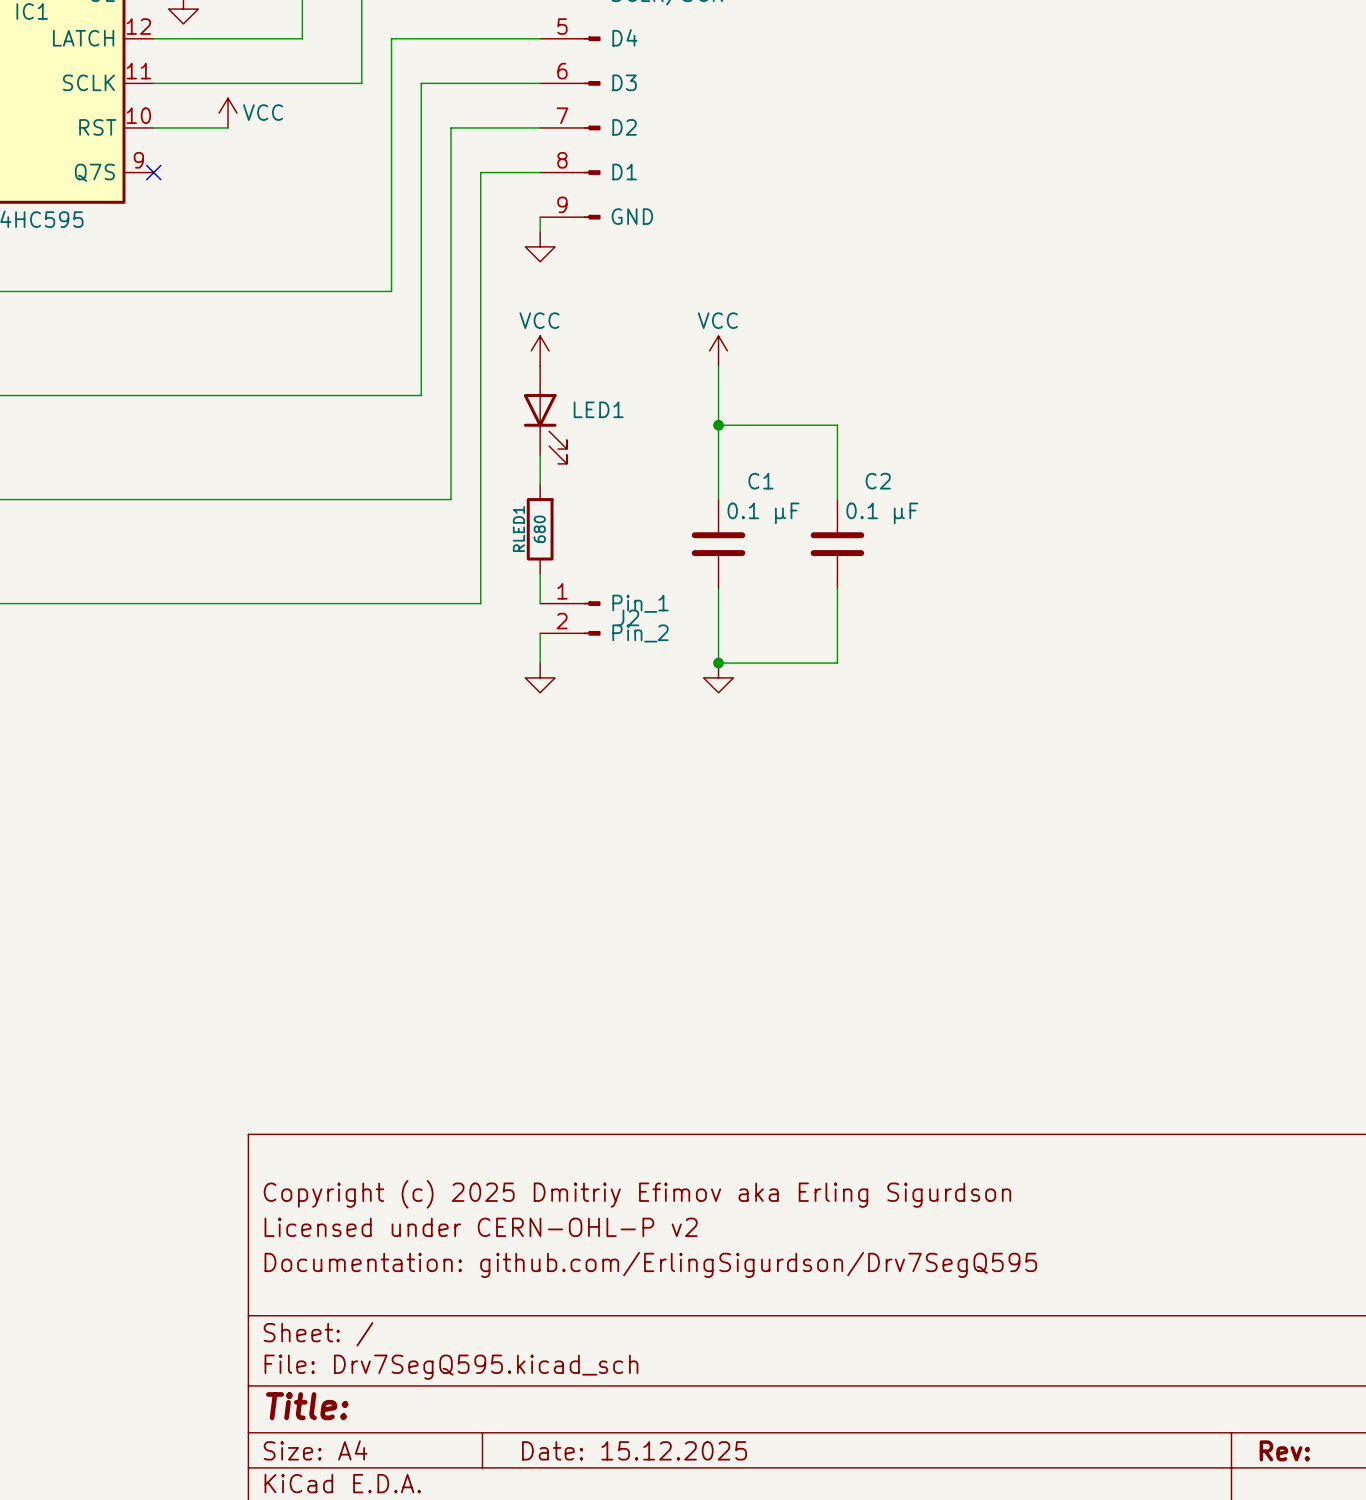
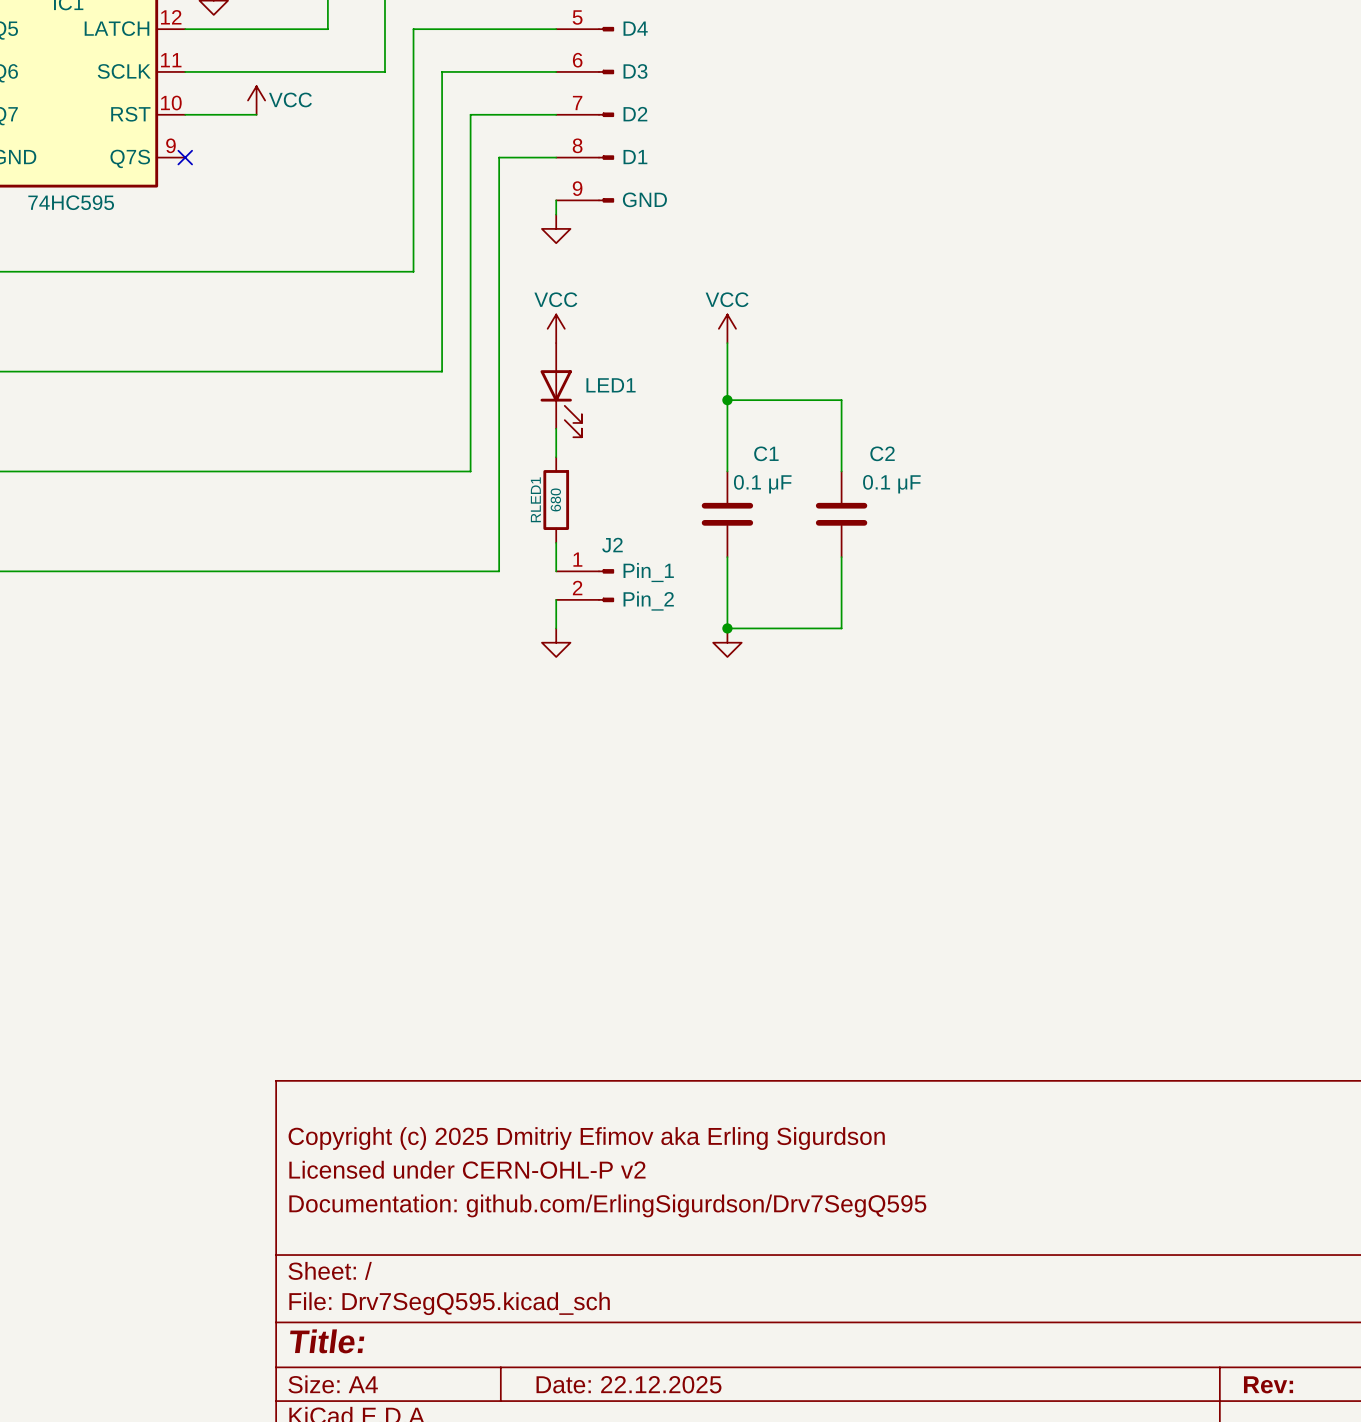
J2 name position: J2 (628, 617) -> J2 (612, 545)
title block: Date: 15.12.2025 (634, 1450) -> Date: 22.12.2025 (628, 1384)

